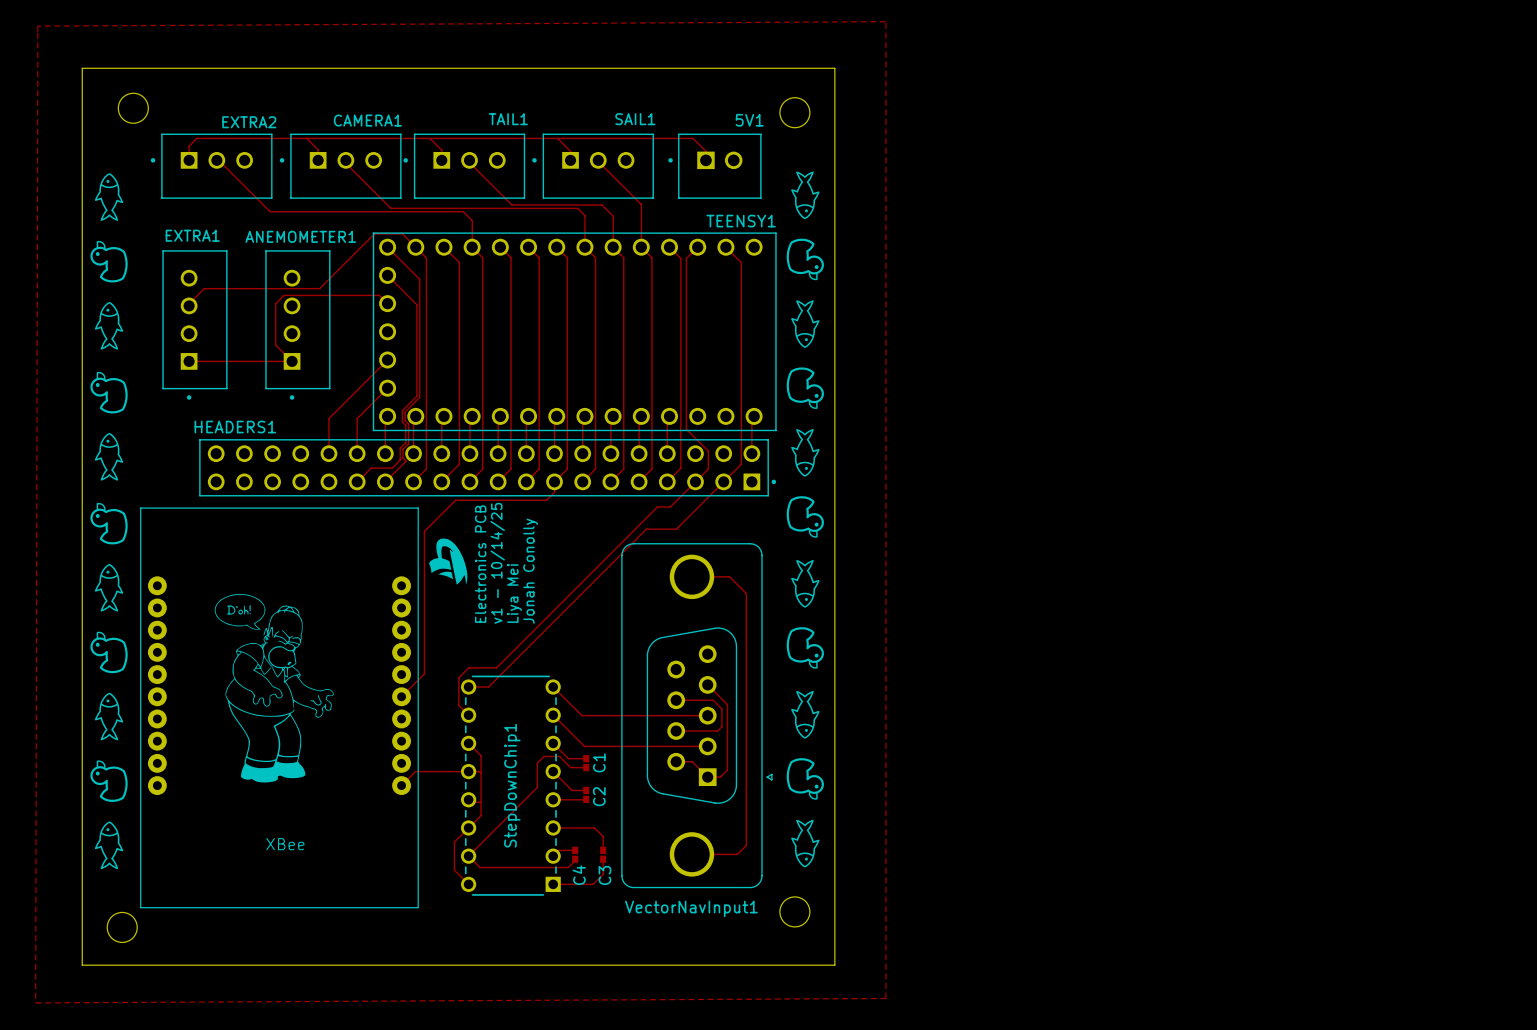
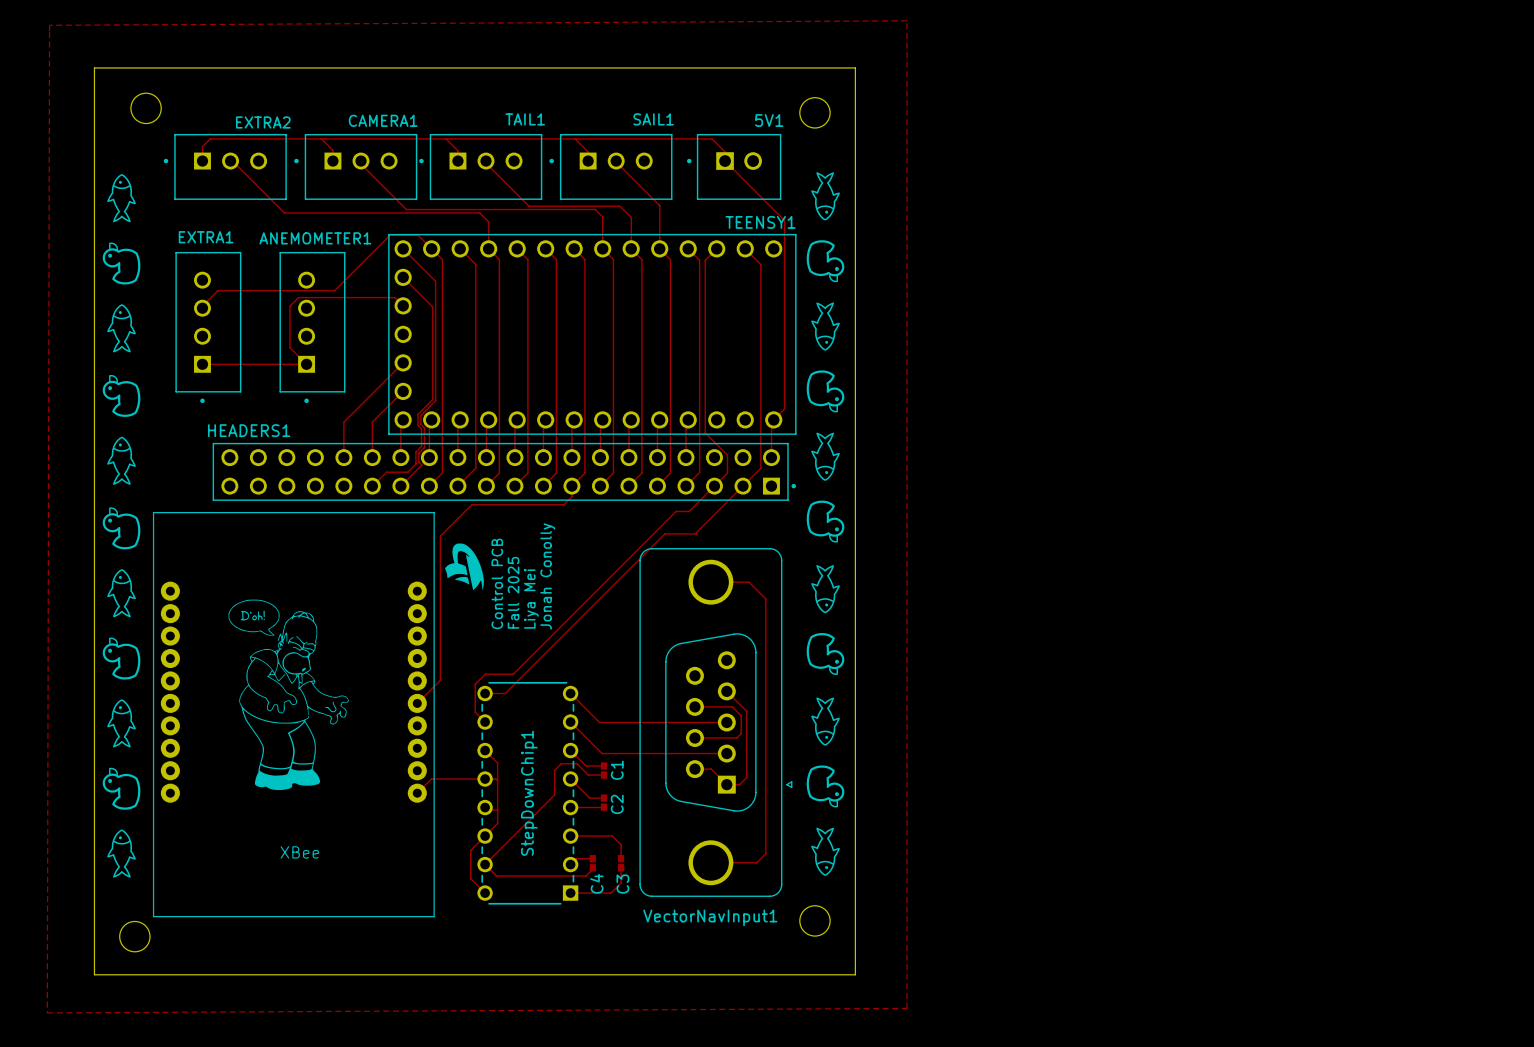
track: none -> (725, 161) (784, 220) (784, 409) (773, 419)
text: v1 - 10/14/25 (497, 563) -> Fall 2025 (513, 592)
text: Electronics PCB (480, 564) -> Control PCB (497, 583)

